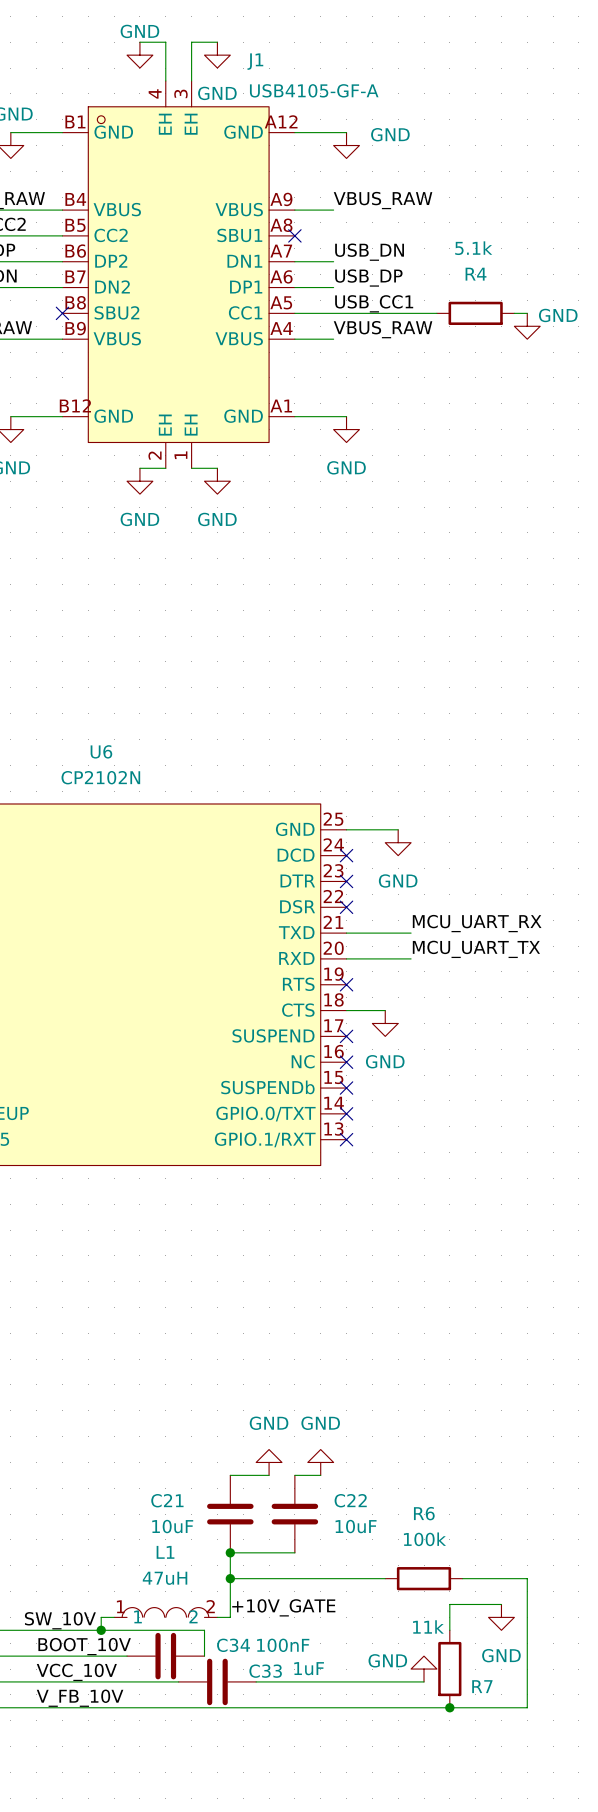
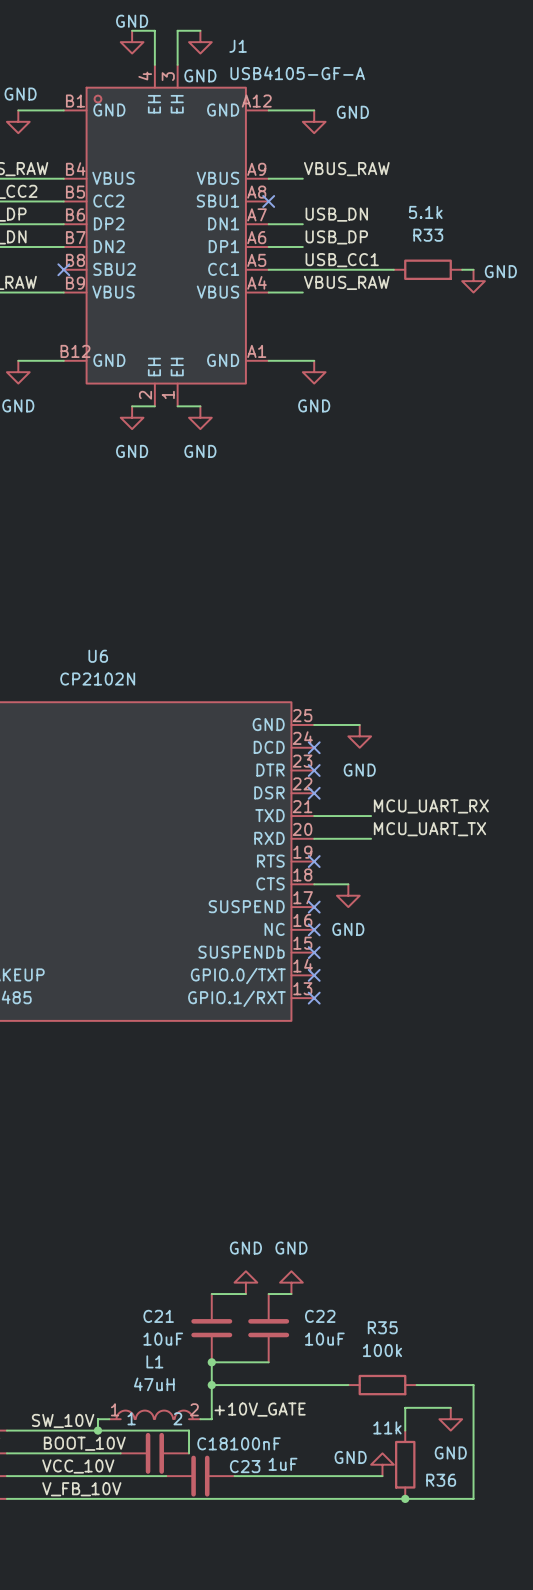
R4 name: R4 (476, 274) -> R33 (428, 235)
R6 name: R6 (424, 1513) -> R35 (382, 1327)
C34 name: C34 (233, 1645) -> C18 (212, 1443)
C33 name: C33 (265, 1671) -> C23 (245, 1466)
R7 name: R7 (482, 1686) -> R36 (441, 1480)

